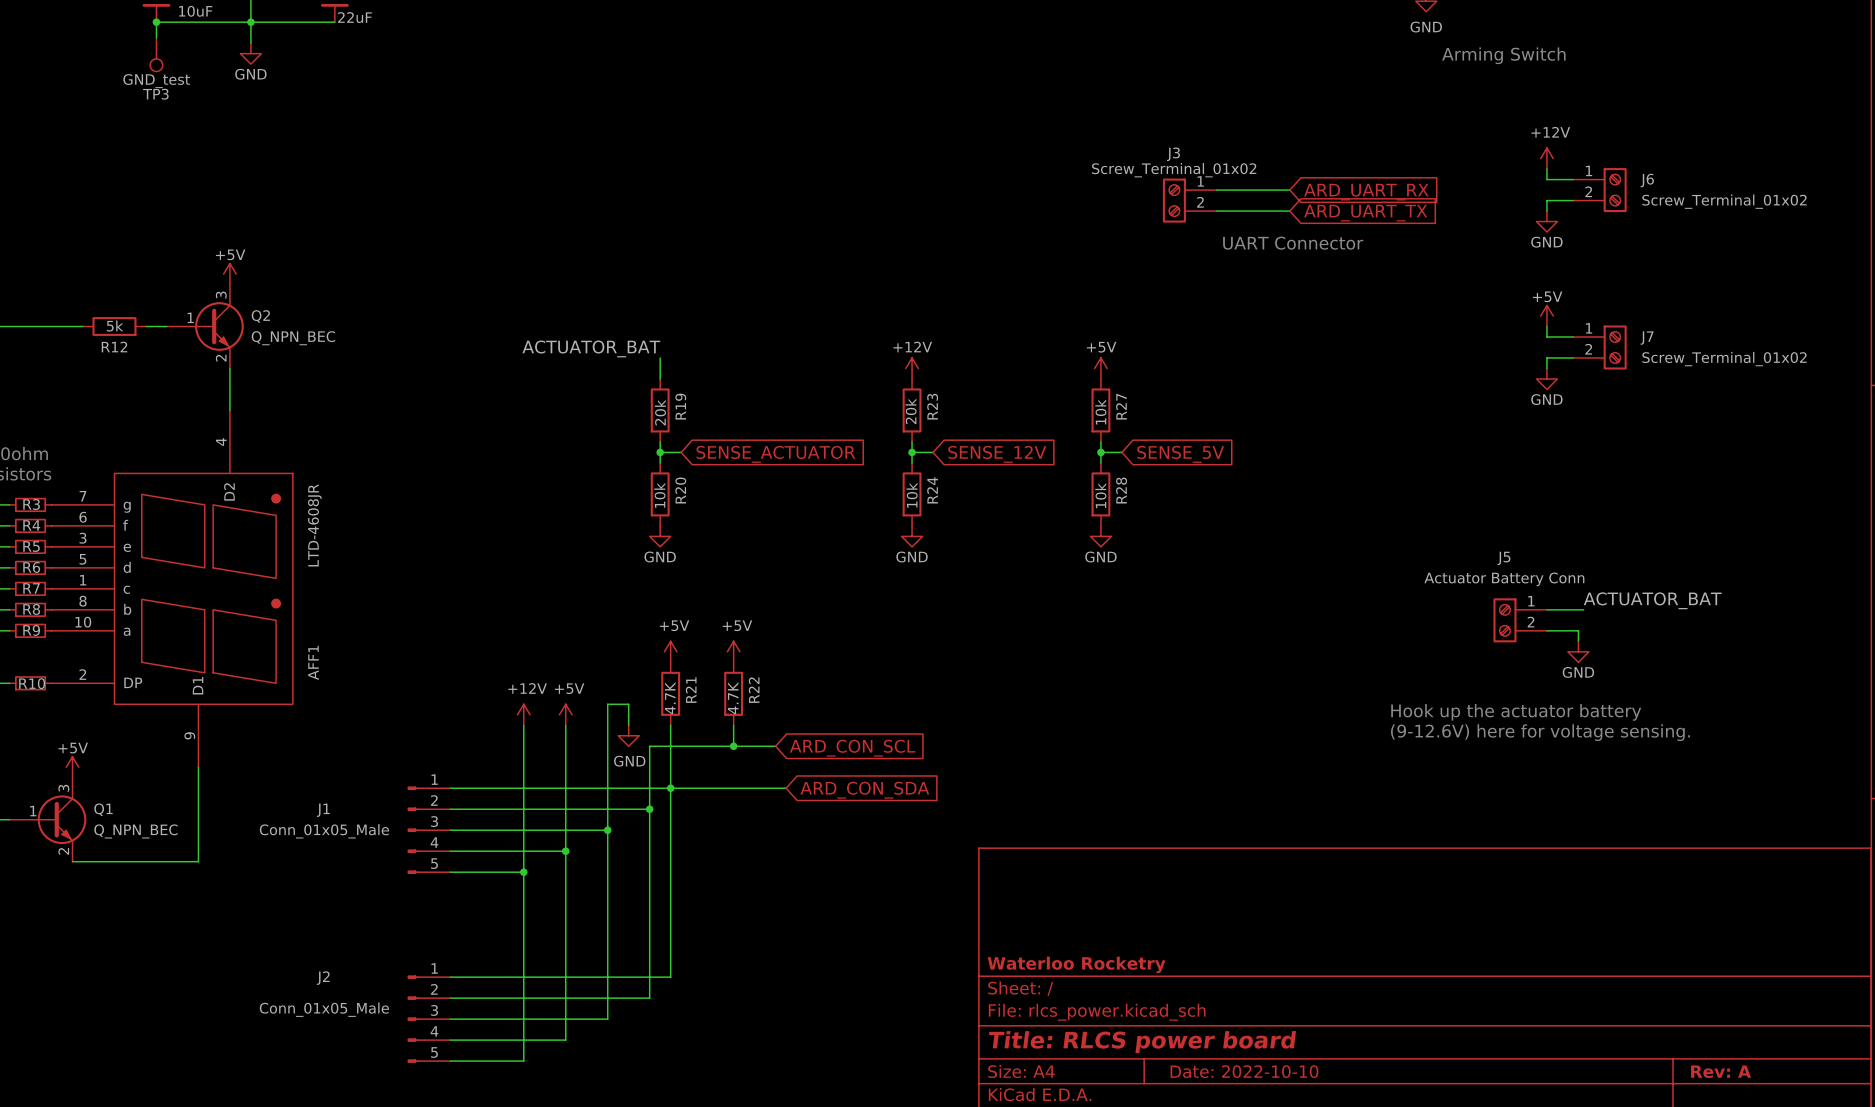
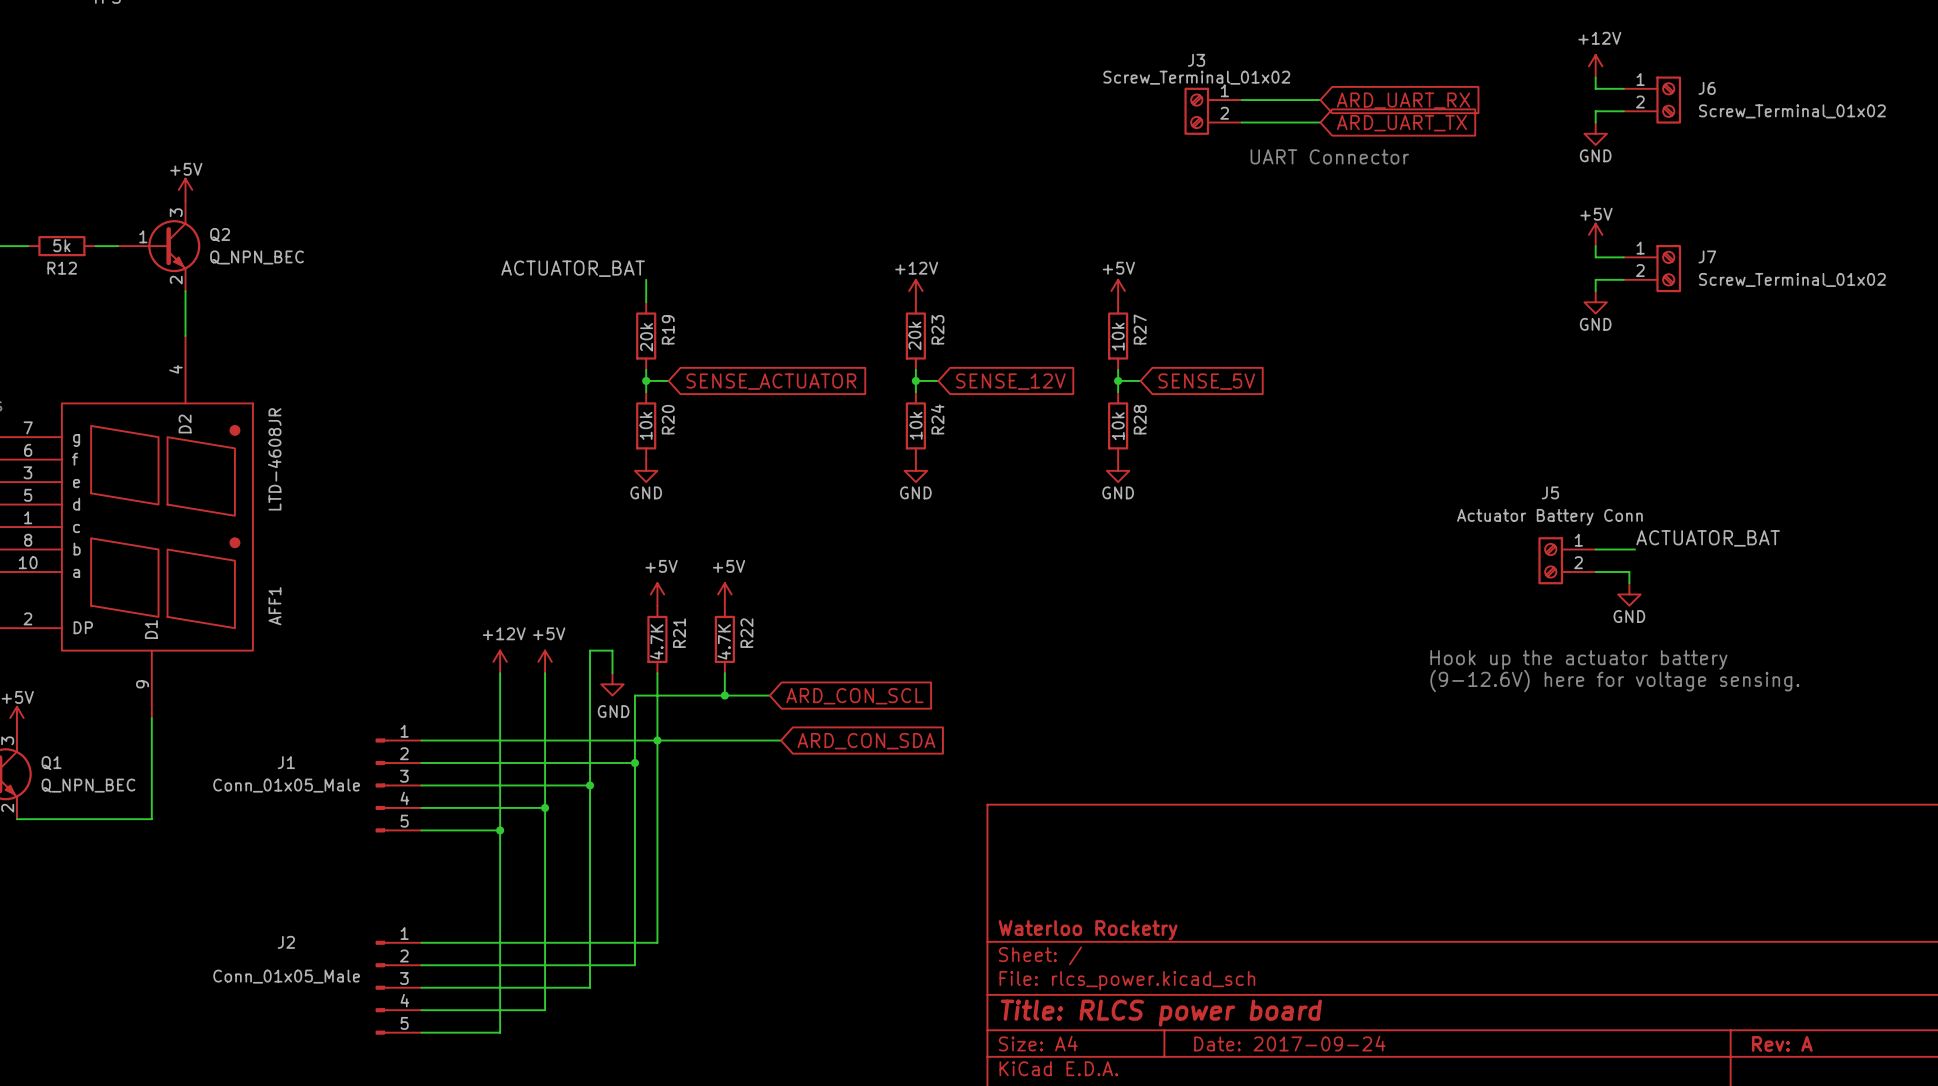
title block: Date: 2022-10-10 (1244, 1071) -> Date: 2017-09-24 (1289, 1043)

